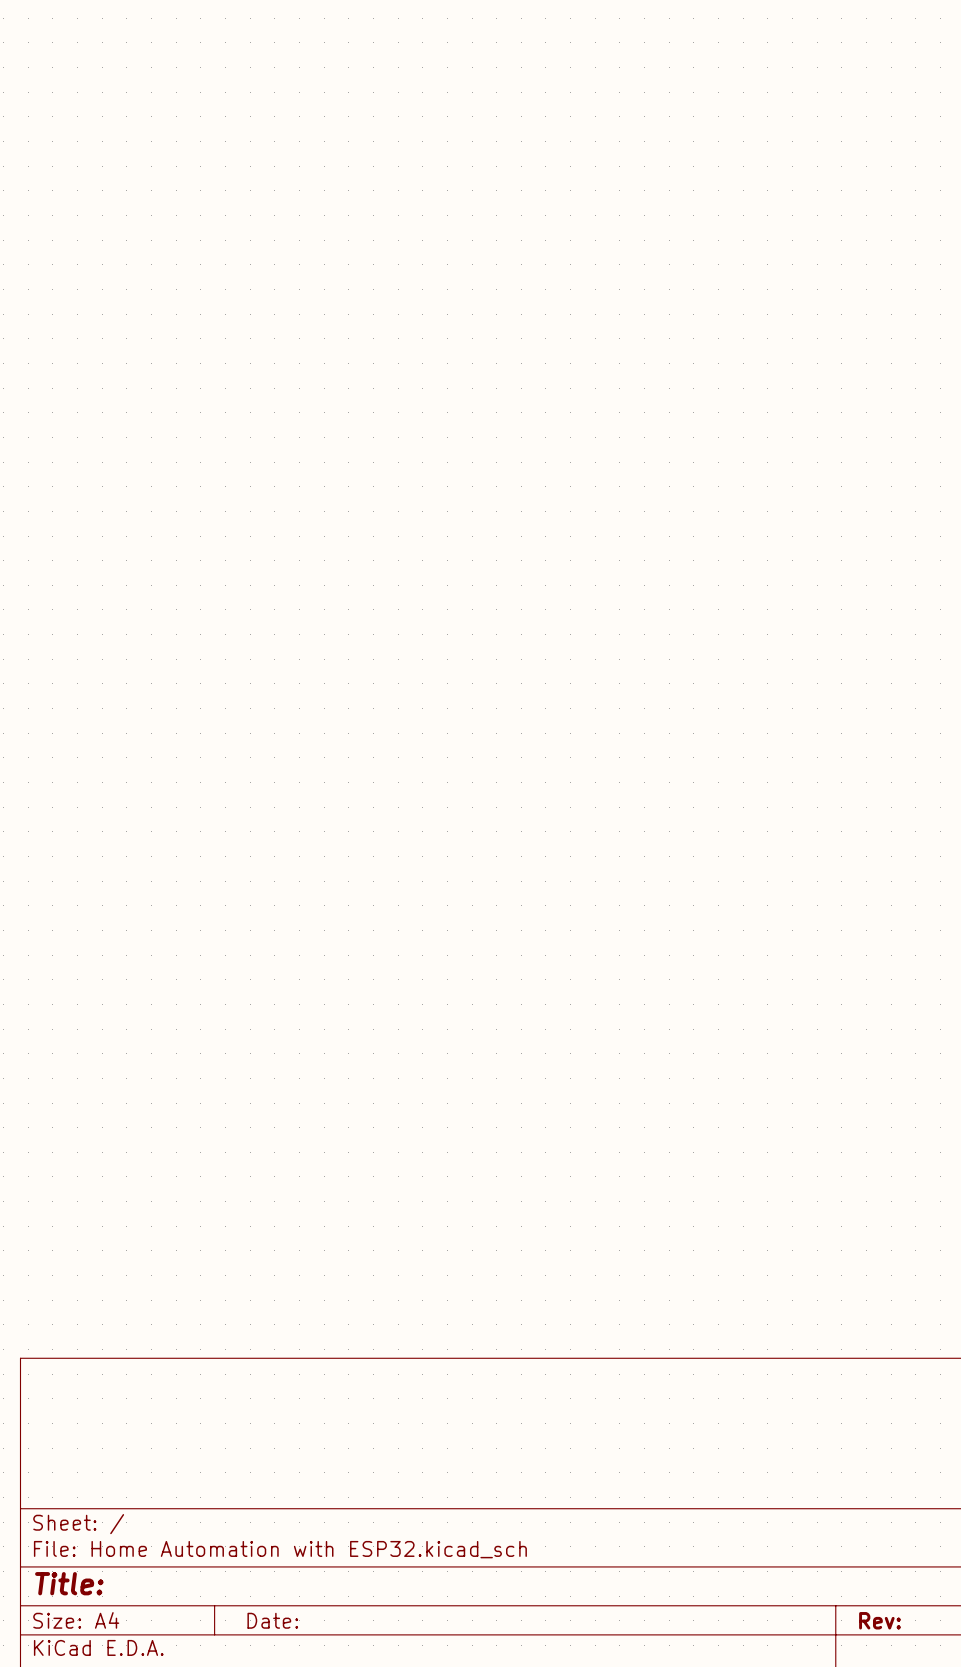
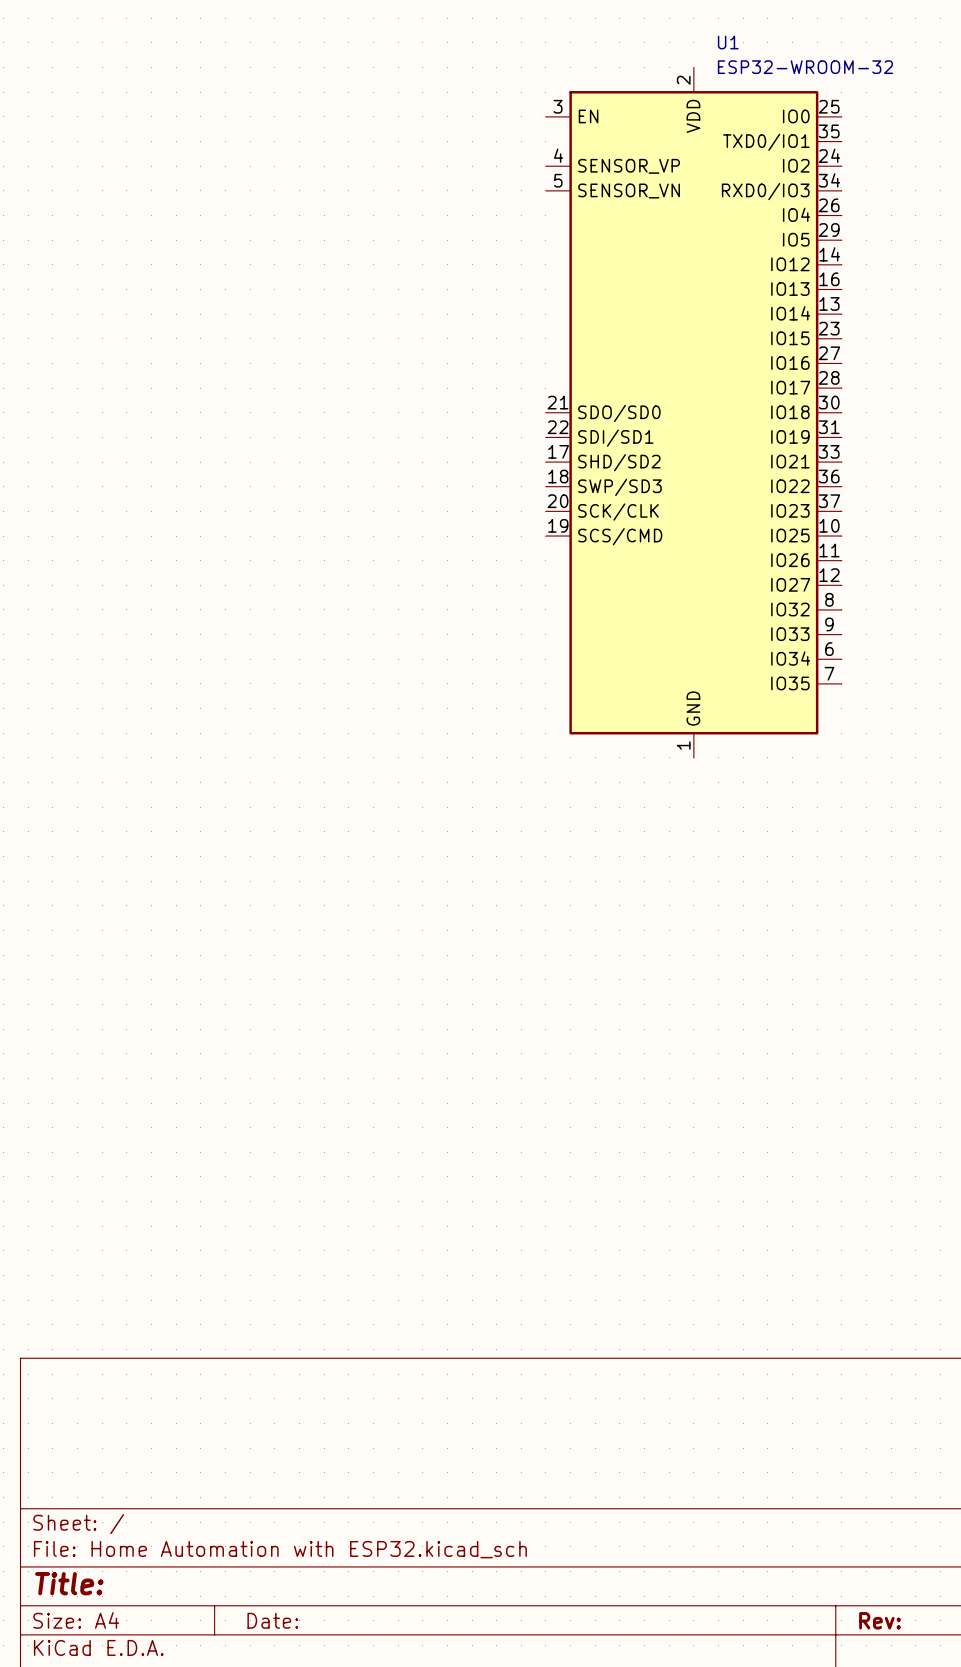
U1: none -> ESP32-WROOM-32 (693, 412)

